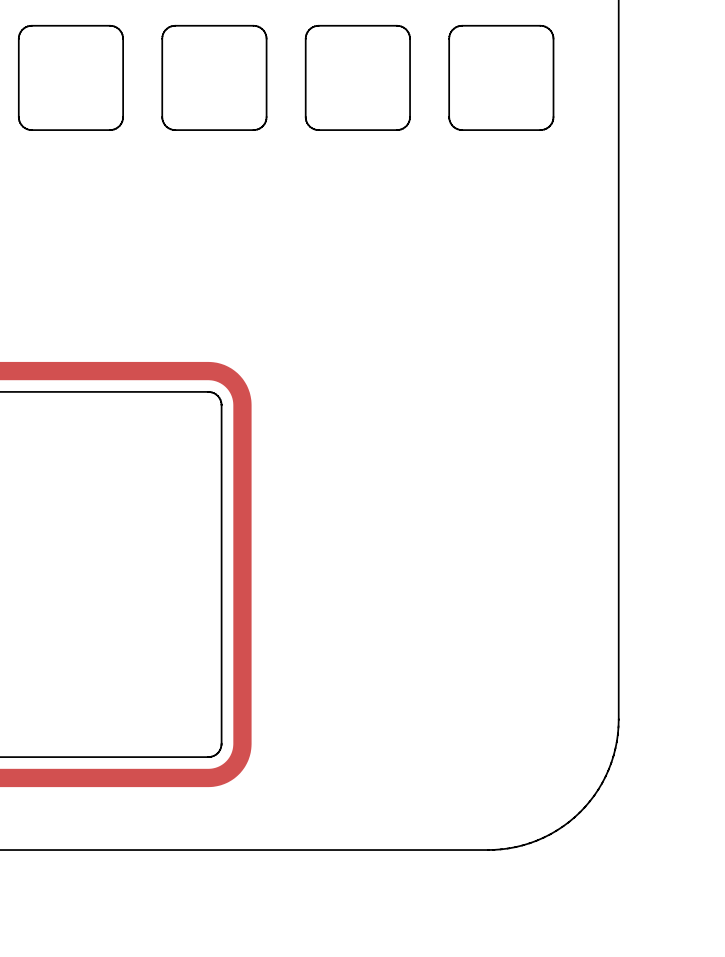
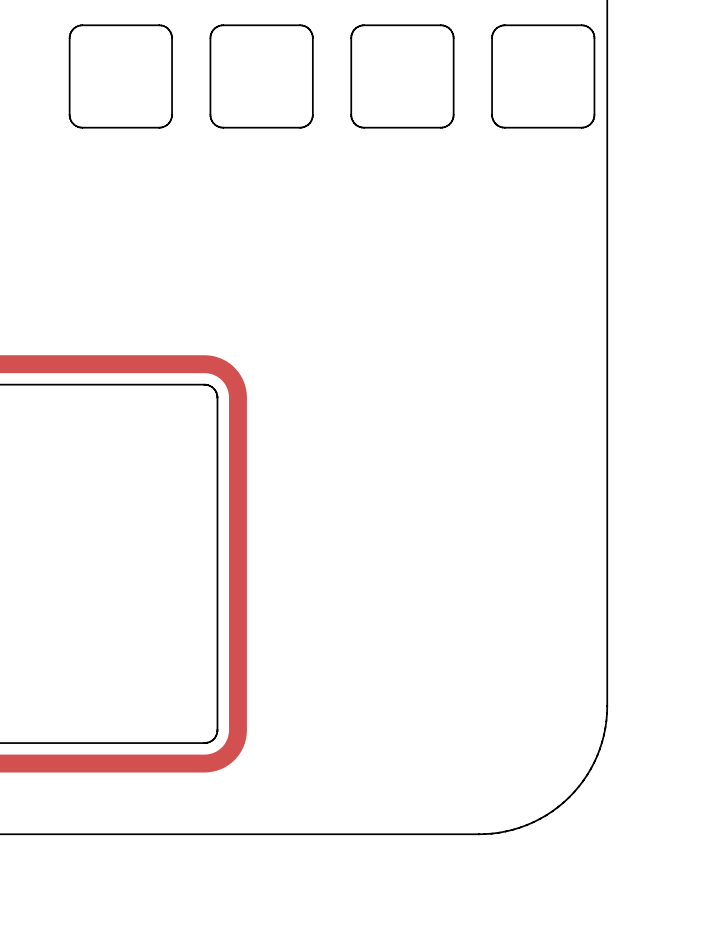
board edge: (83, 25) (30, 25) (22, 30) (18, 38) (18, 117) (21, 125) (31, 130) (83, 130) -> (82, 25) (72, 29) (69, 38) (69, 116) (74, 124) (82, 127)
board edge: (110, 25) (118, 28) (123, 38) (122, 119) (118, 127) (110, 130) -> (108, 25) (161, 25) (169, 30) (172, 38) (172, 114) (170, 121) (160, 127) (108, 127)
board edge: (227, 25) (173, 25) (165, 30) (162, 38) (162, 117) (165, 125) (175, 130) (227, 130) -> (223, 25) (213, 29) (210, 38) (210, 116) (214, 124) (223, 127)
board edge: (253, 25) (262, 28) (266, 38) (266, 119) (261, 127) (253, 130) -> (248, 25) (302, 25) (310, 30) (312, 38) (312, 114) (311, 121) (301, 127) (248, 127)
board edge: (370, 25) (317, 25) (308, 30) (305, 38) (305, 117) (308, 125) (318, 130) (370, 130) -> (364, 25) (354, 29) (351, 38) (351, 116) (355, 124) (364, 127)
board edge: (397, 25) (405, 28) (410, 38) (409, 119) (405, 127) (397, 130) -> (389, 25) (443, 25) (450, 30) (453, 38) (453, 114) (451, 121) (442, 127) (389, 127)
board edge: (514, 25) (460, 25) (452, 30) (449, 38) (449, 117) (452, 125) (462, 130) (514, 130) -> (504, 25) (495, 29) (492, 38) (492, 116) (496, 124) (504, 127)
board edge: (540, 25) (549, 28) (553, 38) (553, 119) (548, 127) (540, 130) -> (530, 25) (583, 25) (591, 30) (594, 38) (594, 114) (592, 121) (583, 127) (530, 127)

